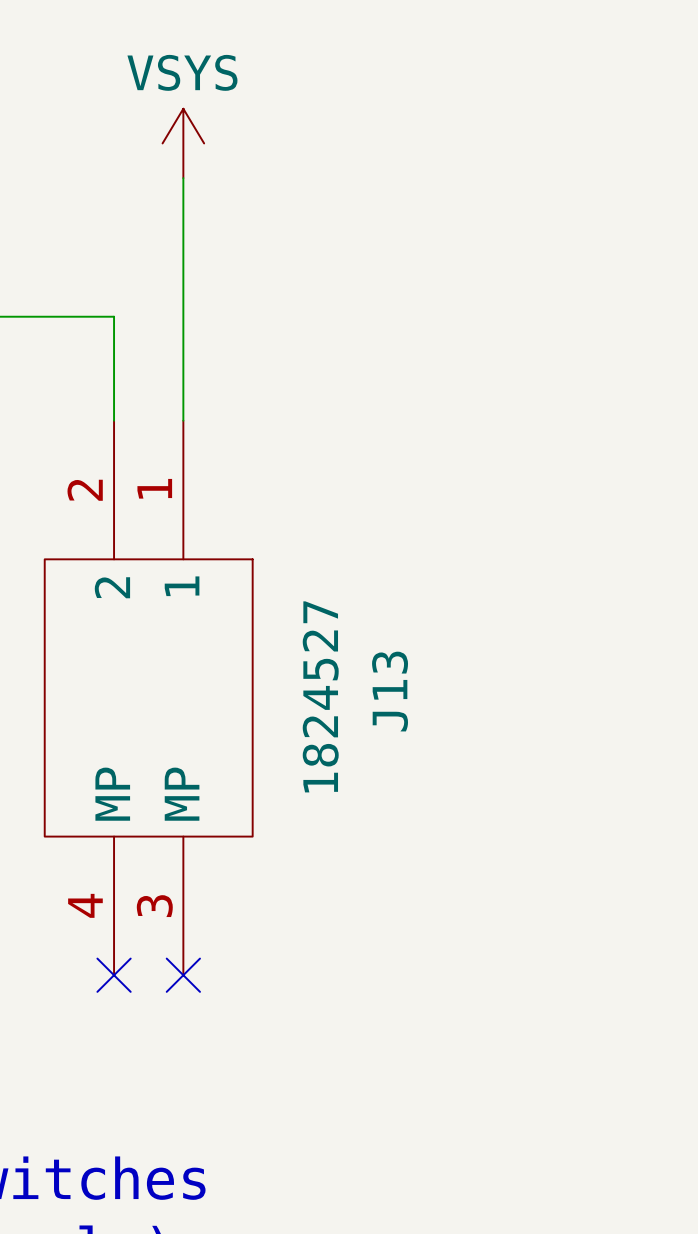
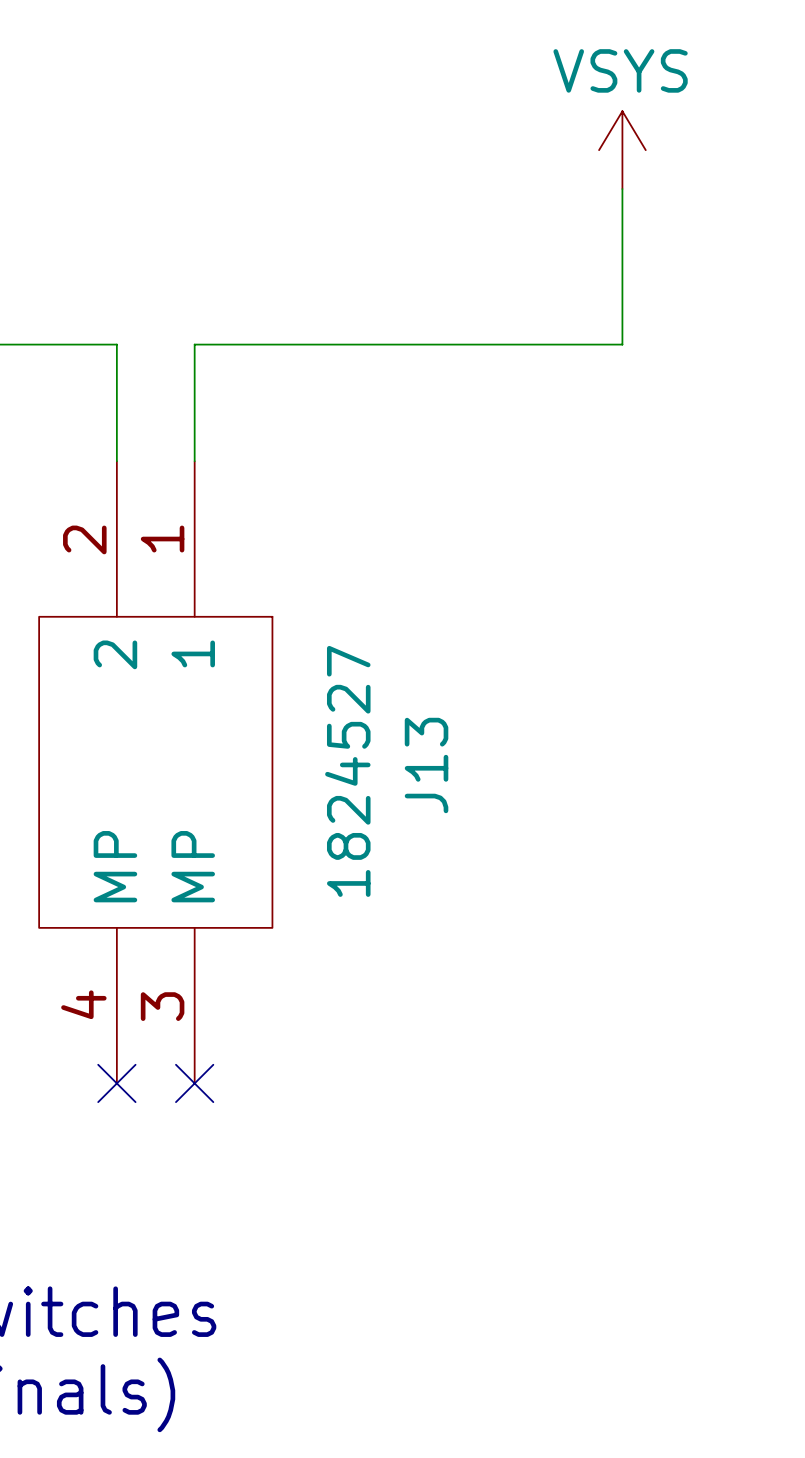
power symbol position: VSYS (183, 143) -> VSYS (622, 150)
wire: (183, 178) (183, 316) -> (622, 189) (622, 344) (194, 344)

